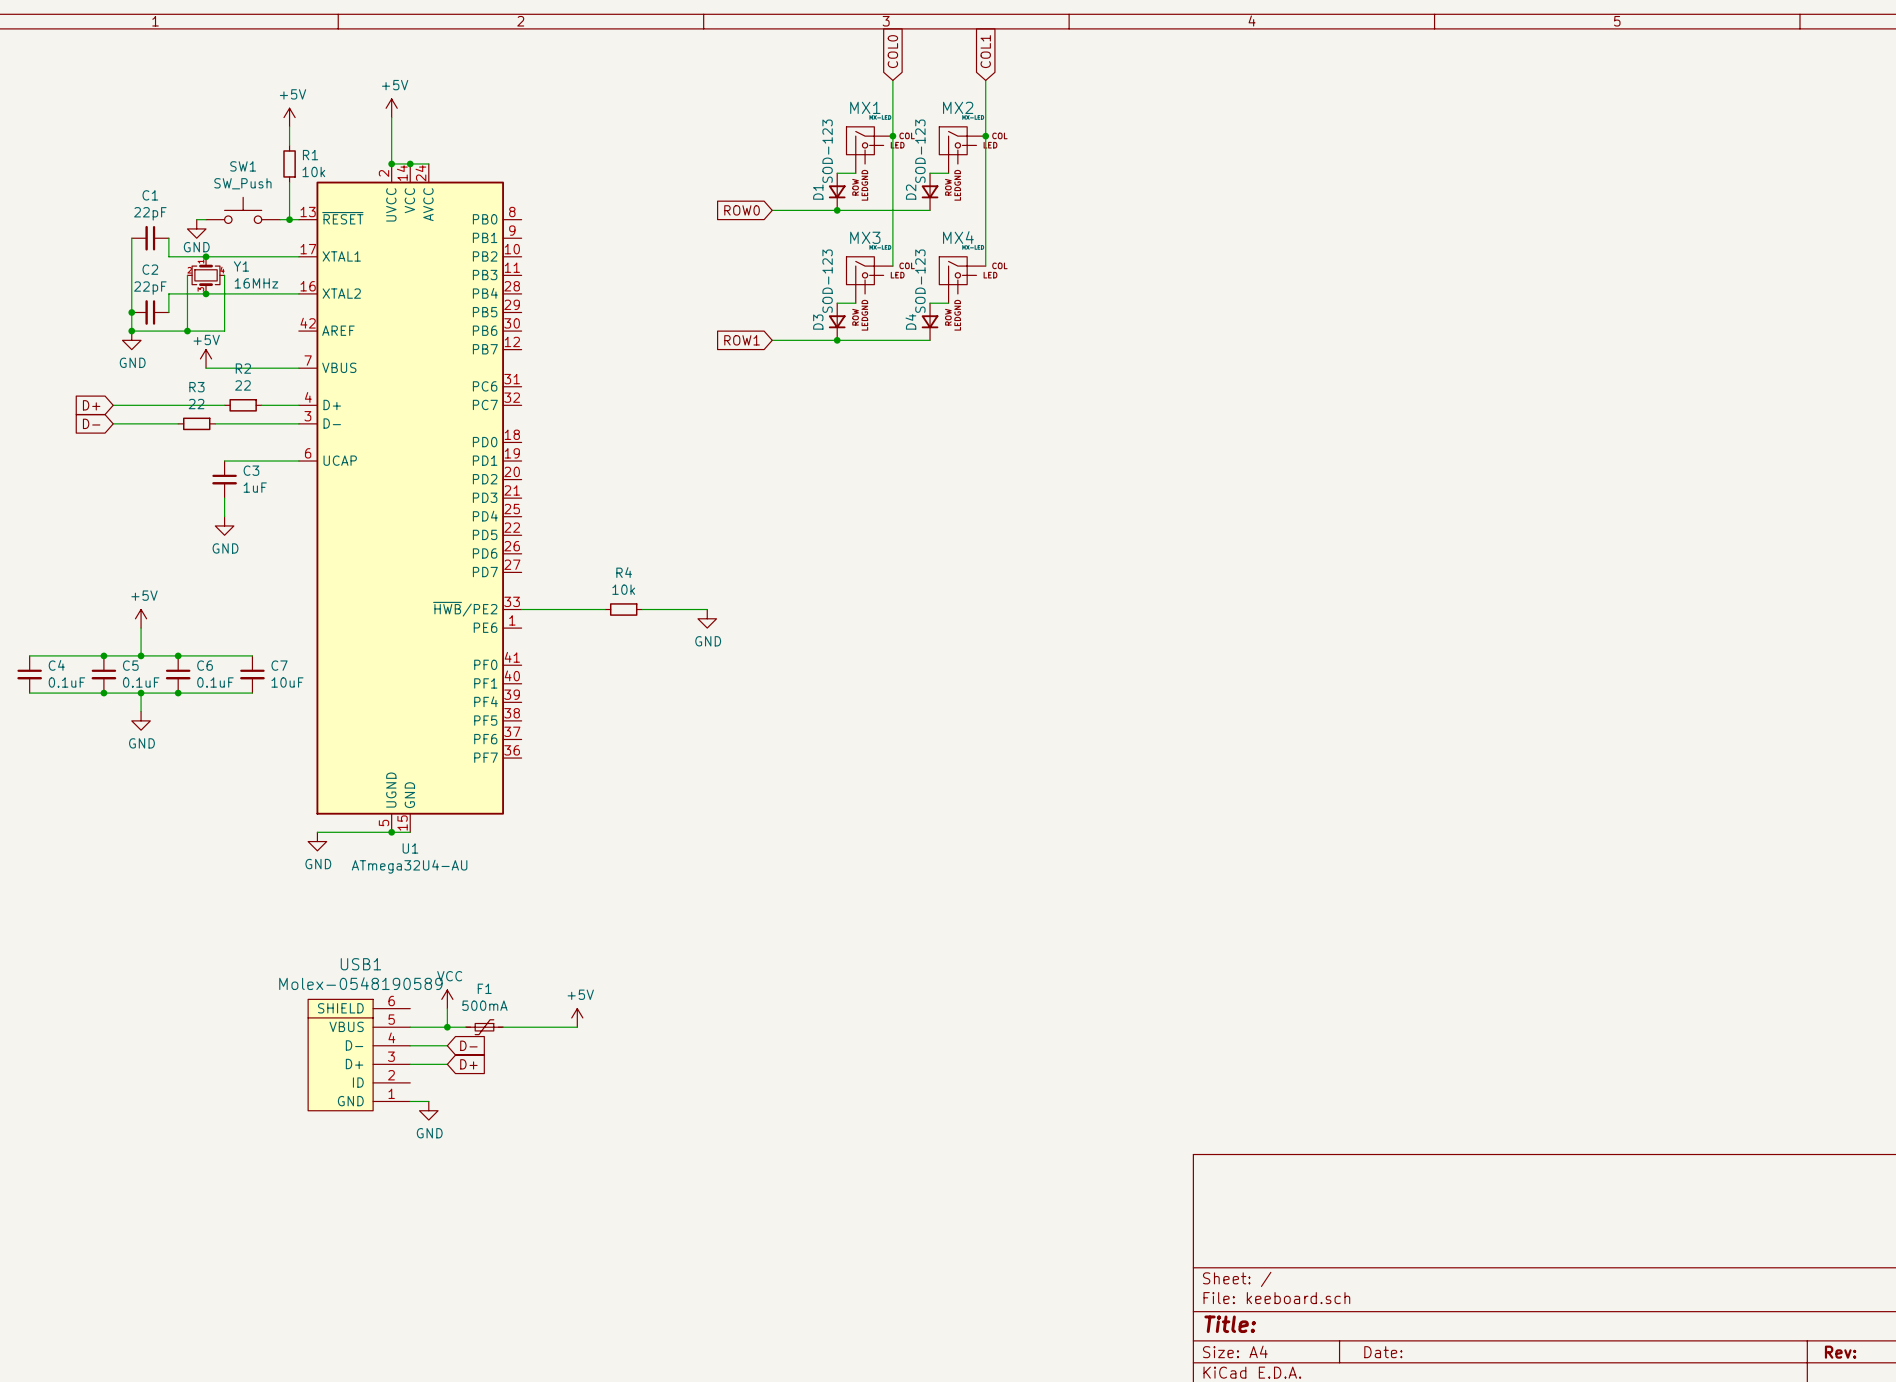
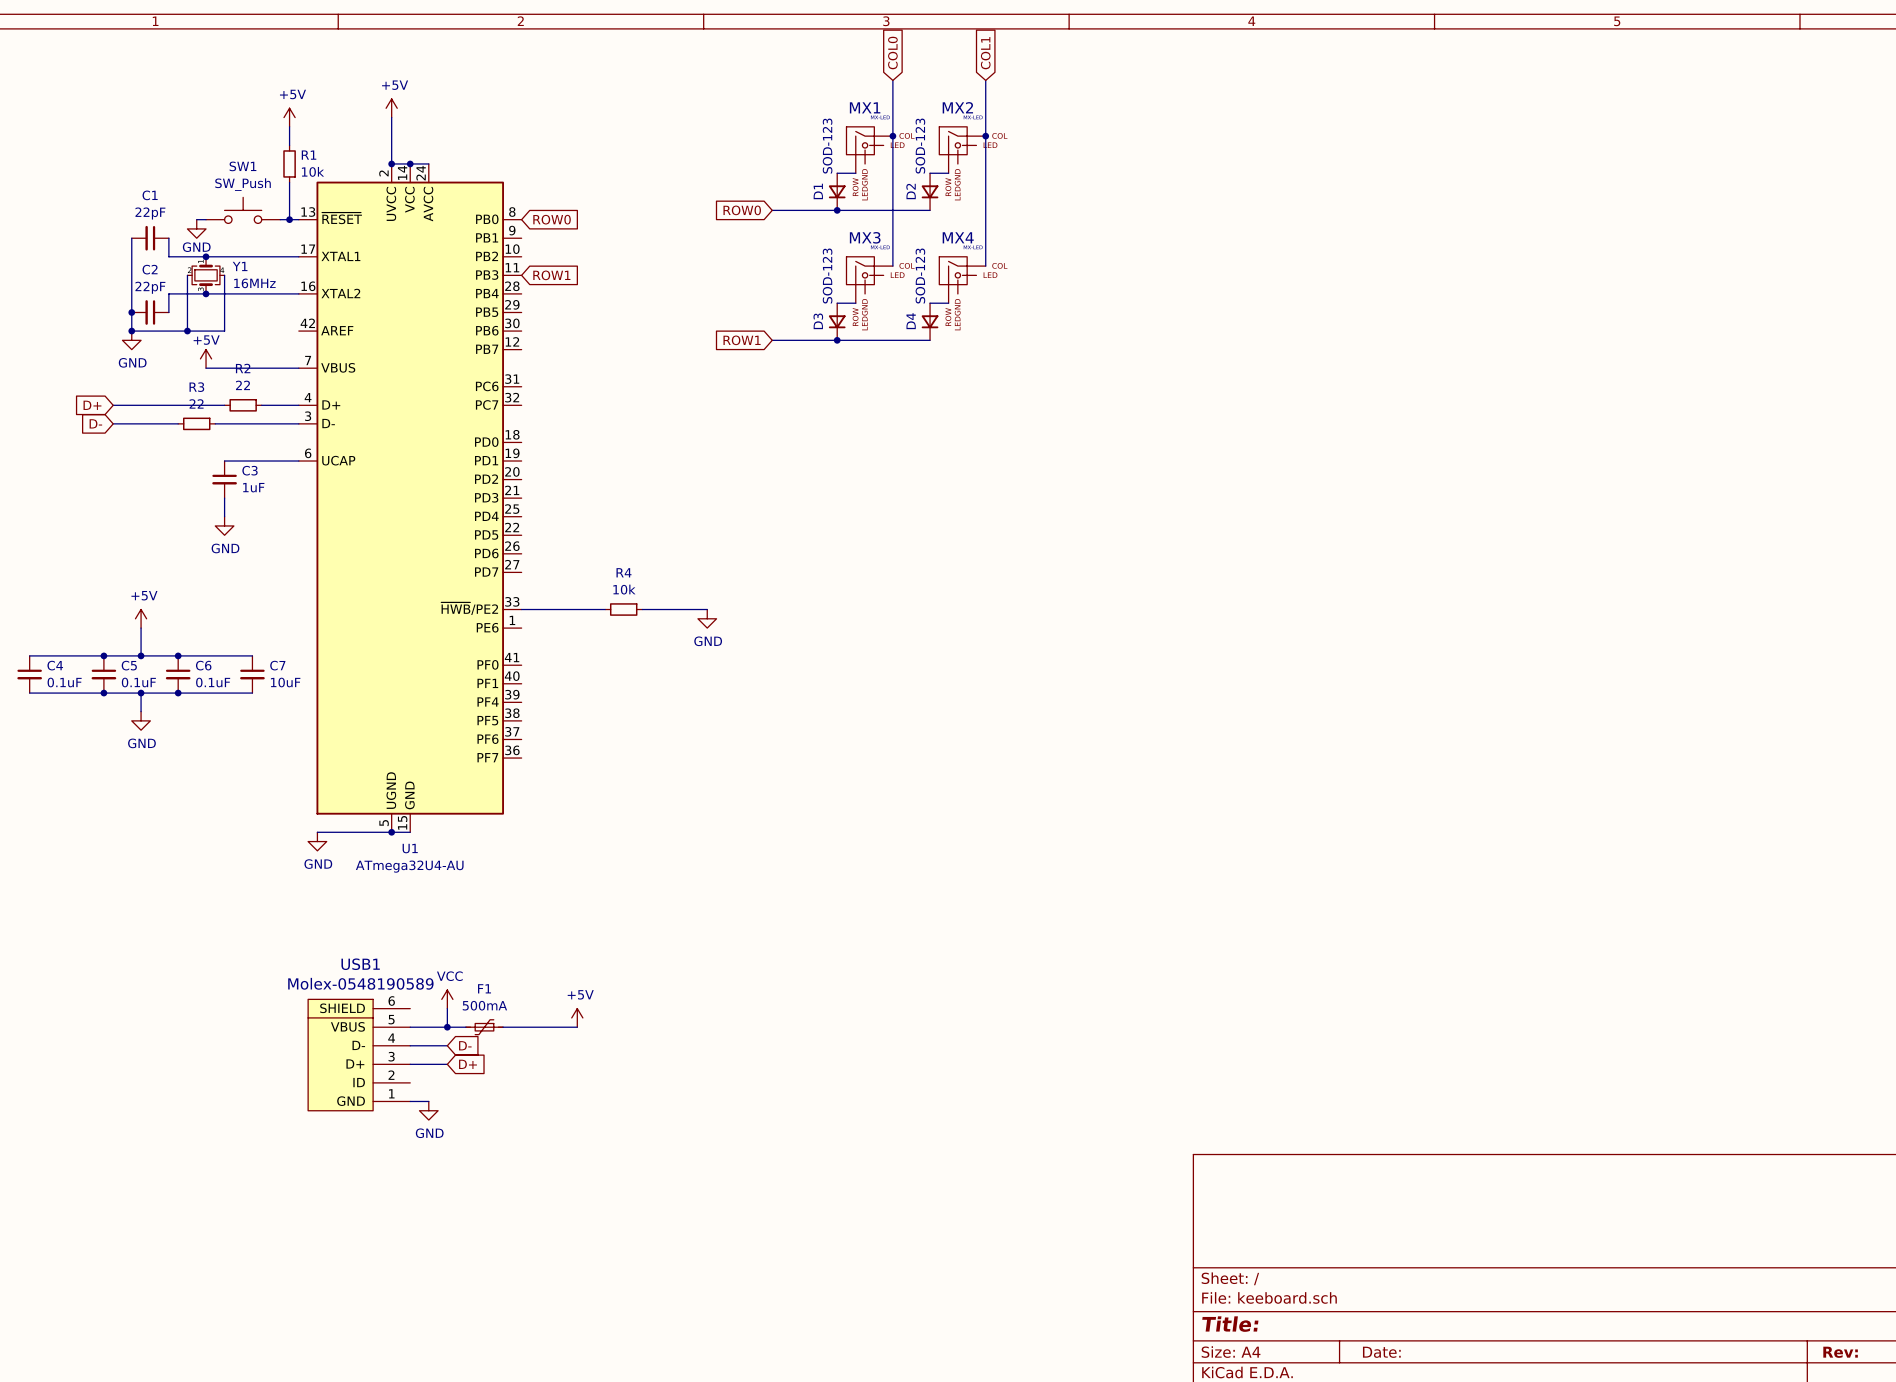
global label: none -> ROW0 (552, 219)
global label: none -> ROW1 (551, 275)

